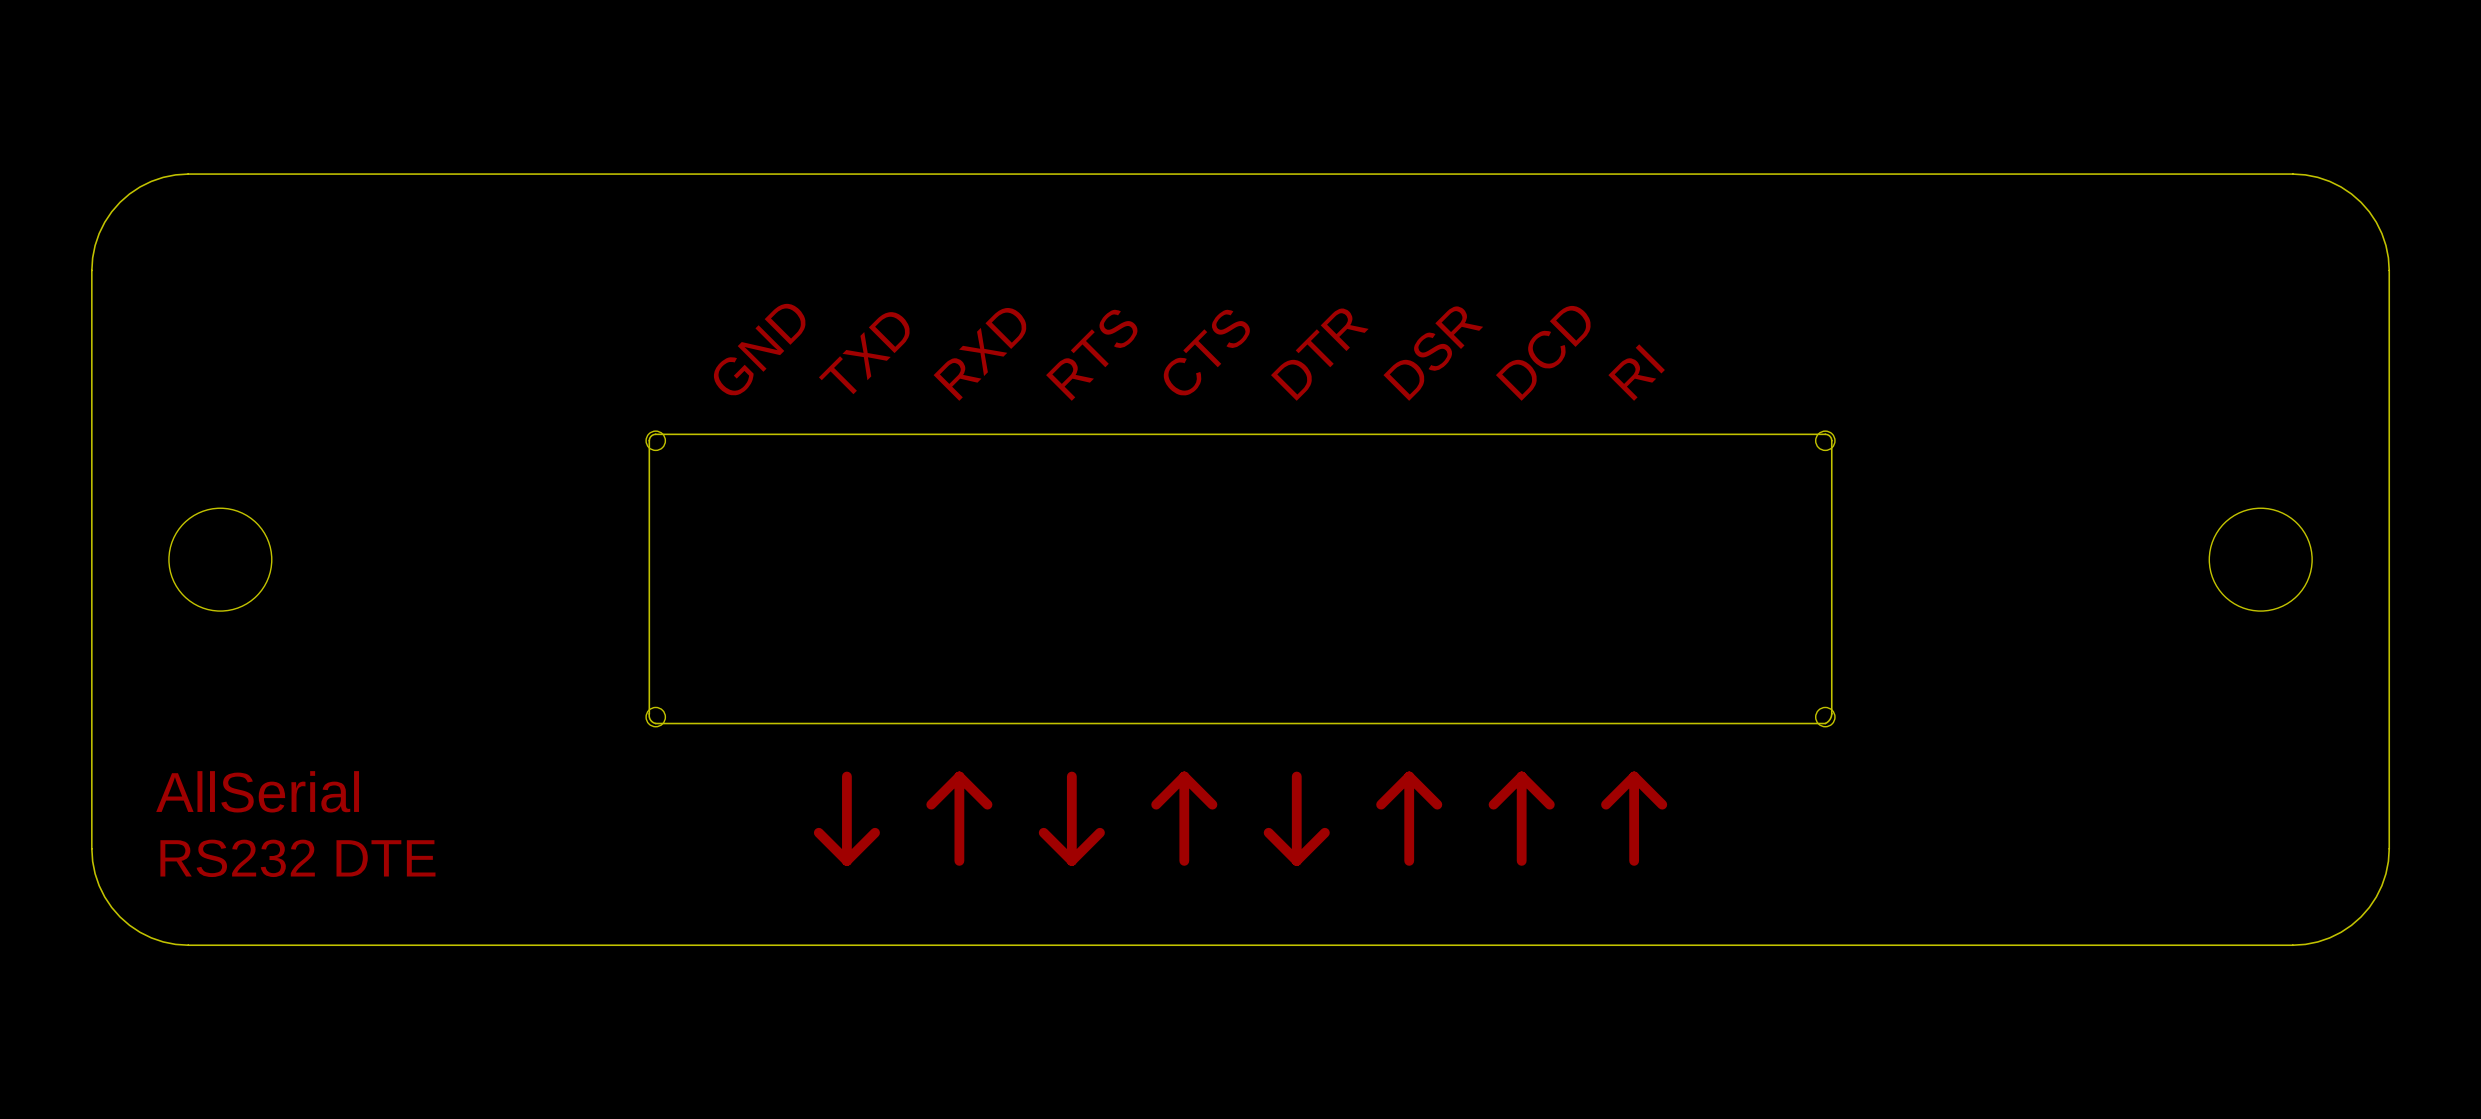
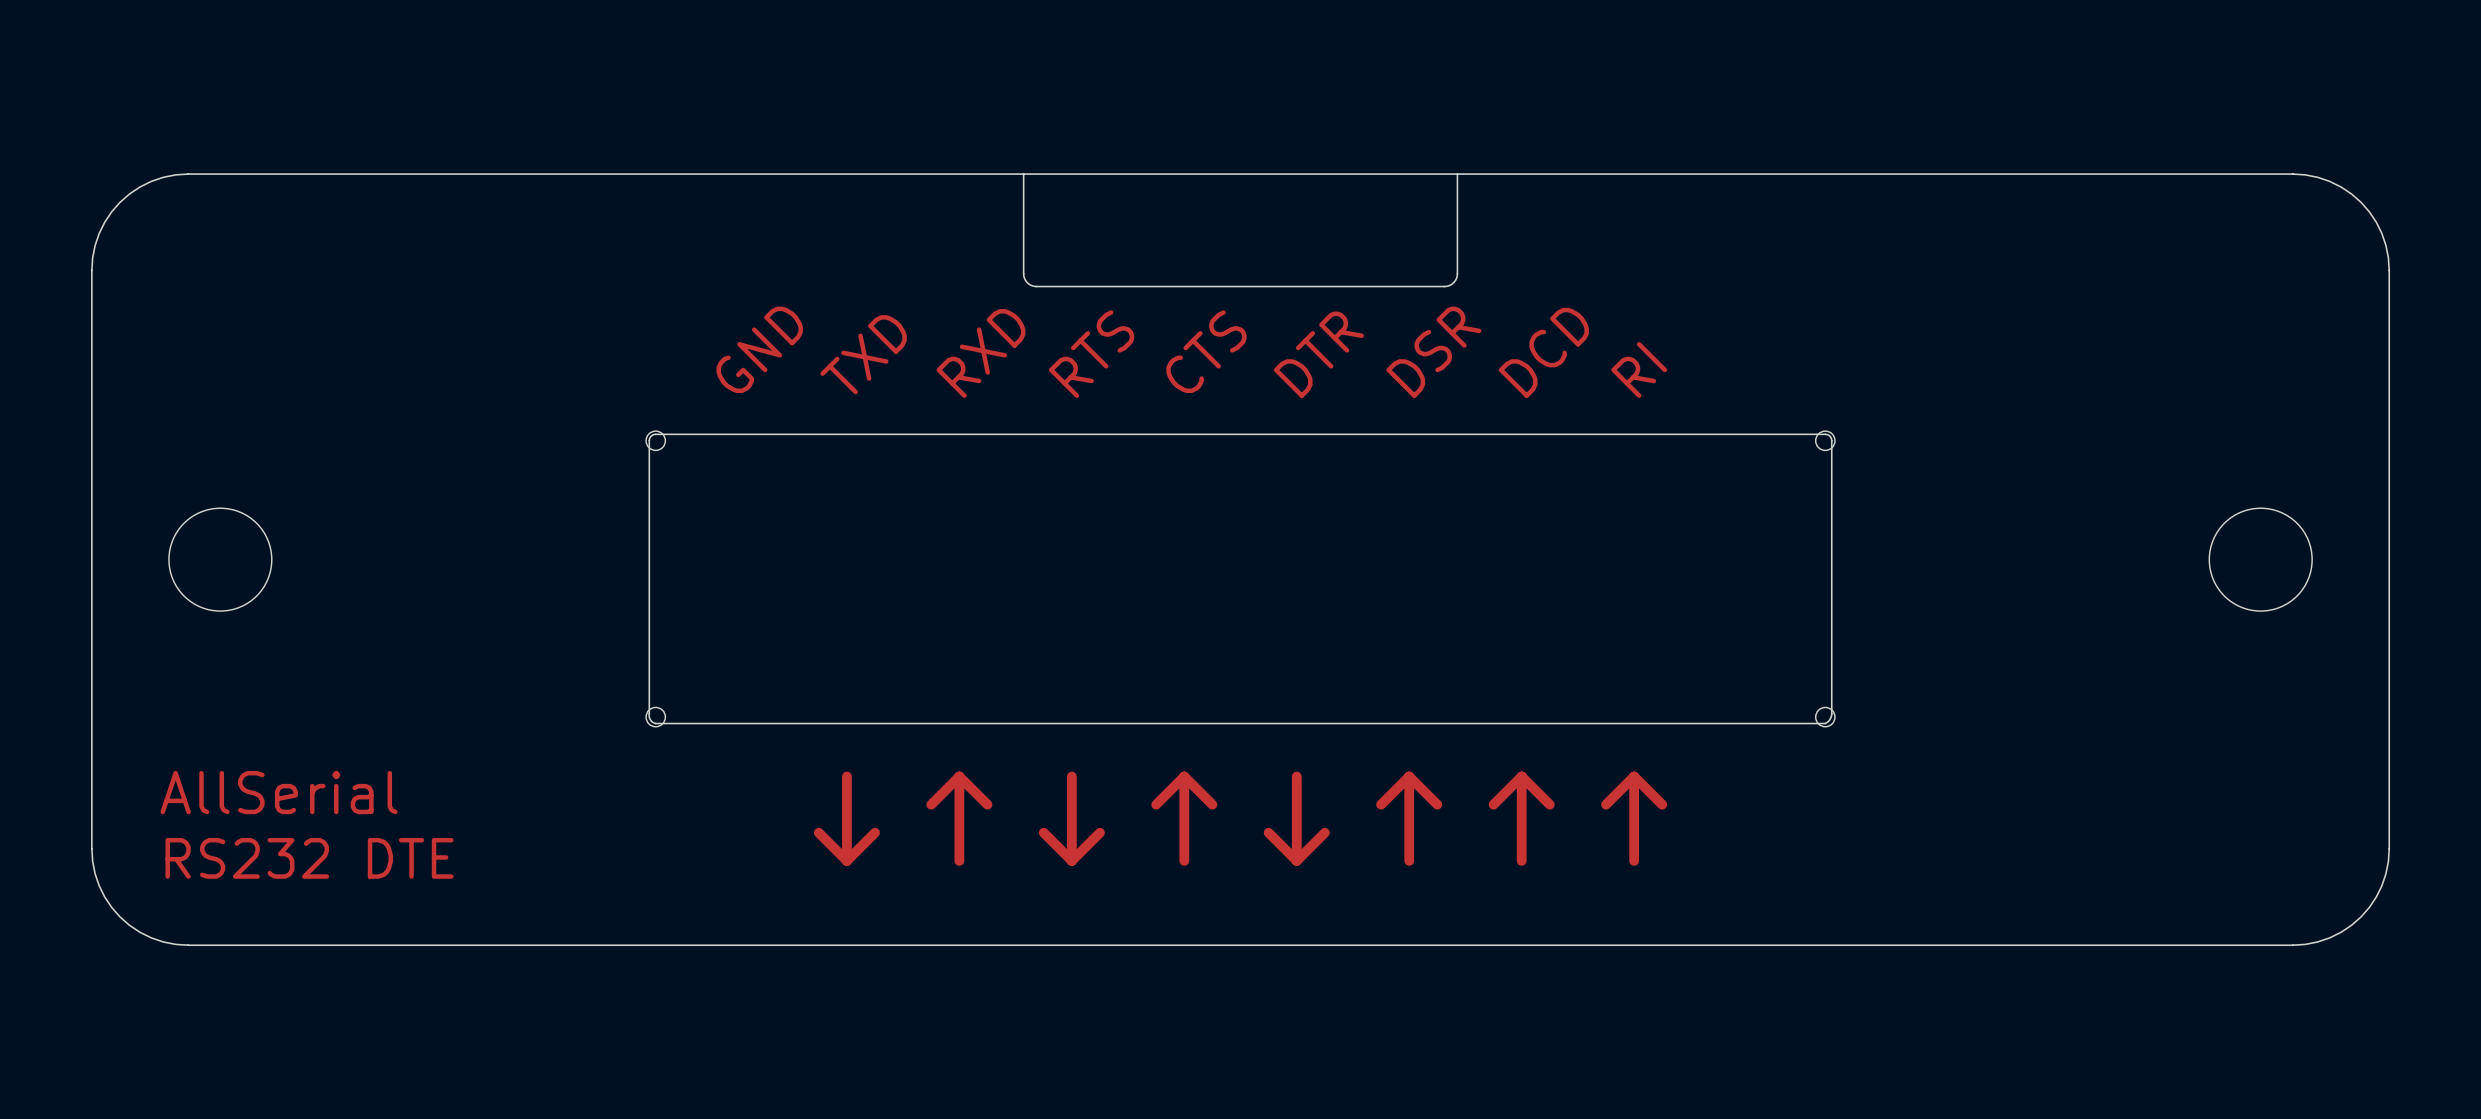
board edge: none -> (1023, 174) (1023, 275) (1028, 283) (1036, 286) (1447, 286) (1454, 281) (1457, 275) (1457, 174)

